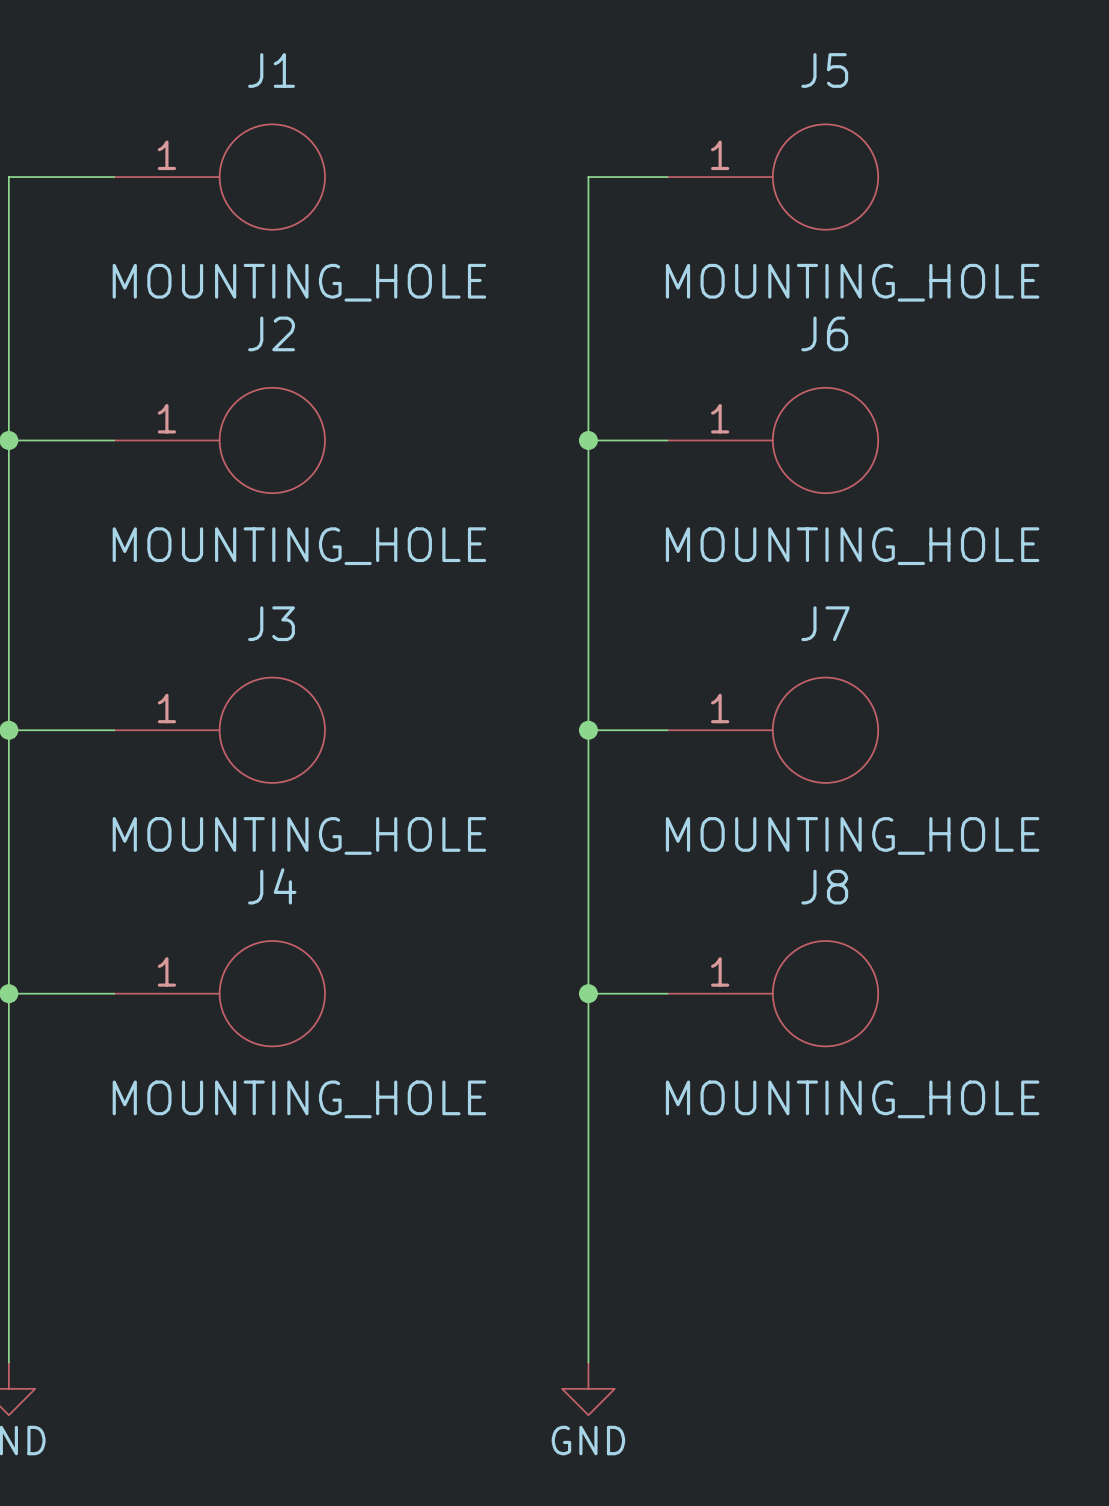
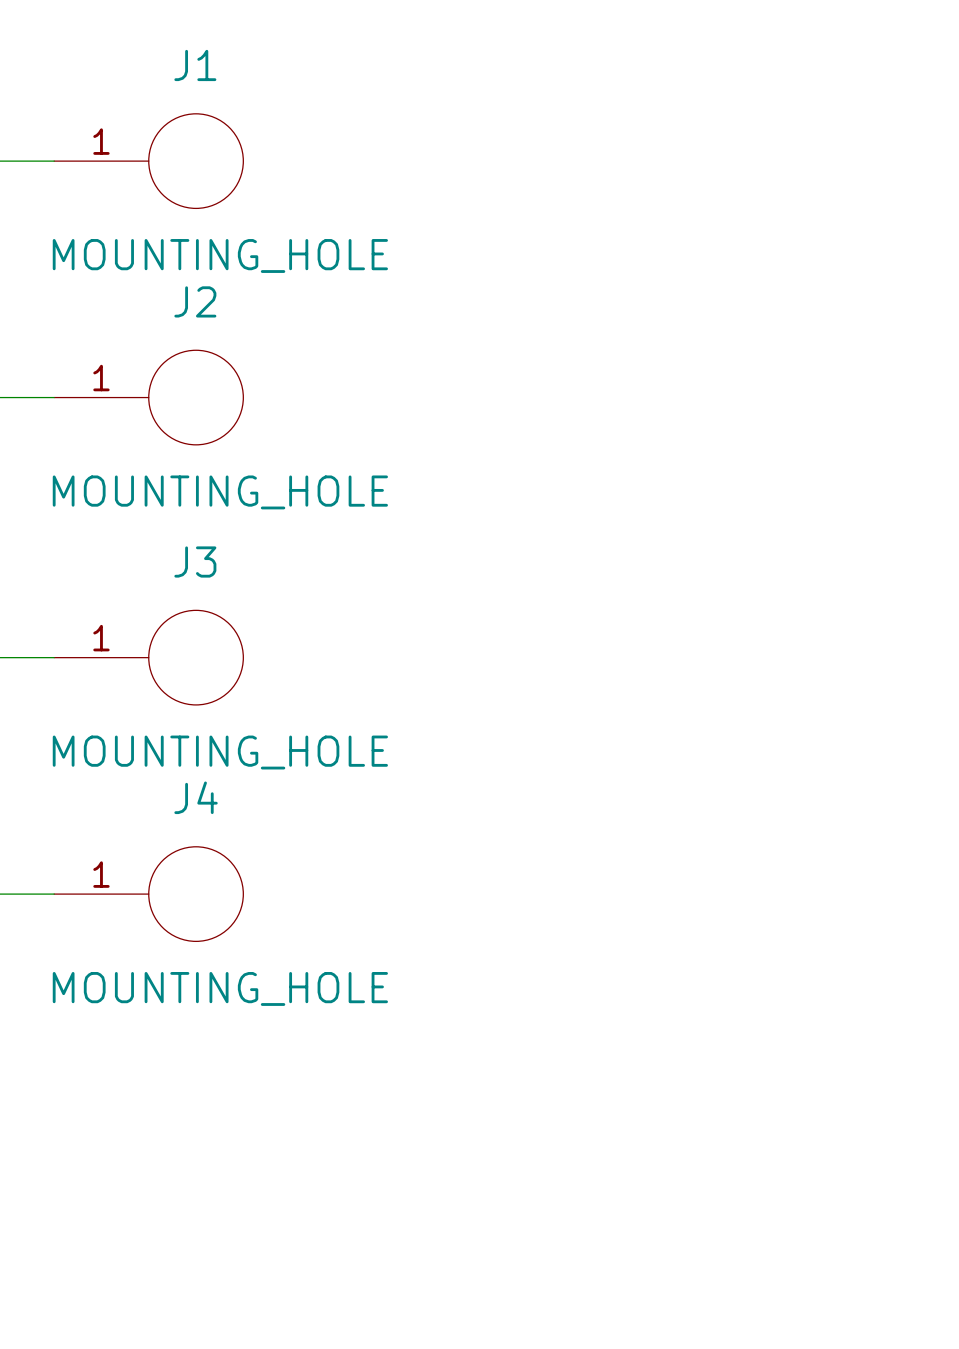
wire: (667, 177) (588, 177) (588, 1362) -> none
J5: MOUNTING_HOLE (772, 177) -> none
wire: (588, 440) (667, 440) -> none
junction: (588, 440) -> none
J6: MOUNTING_HOLE (772, 440) -> none
wire: (588, 730) (667, 730) -> none
junction: (588, 730) -> none
J7: MOUNTING_HOLE (772, 730) -> none
wire: (588, 993) (667, 993) -> none
junction: (588, 993) -> none
J8: MOUNTING_HOLE (772, 993) -> none
power symbol: GND (588, 1388) -> none

